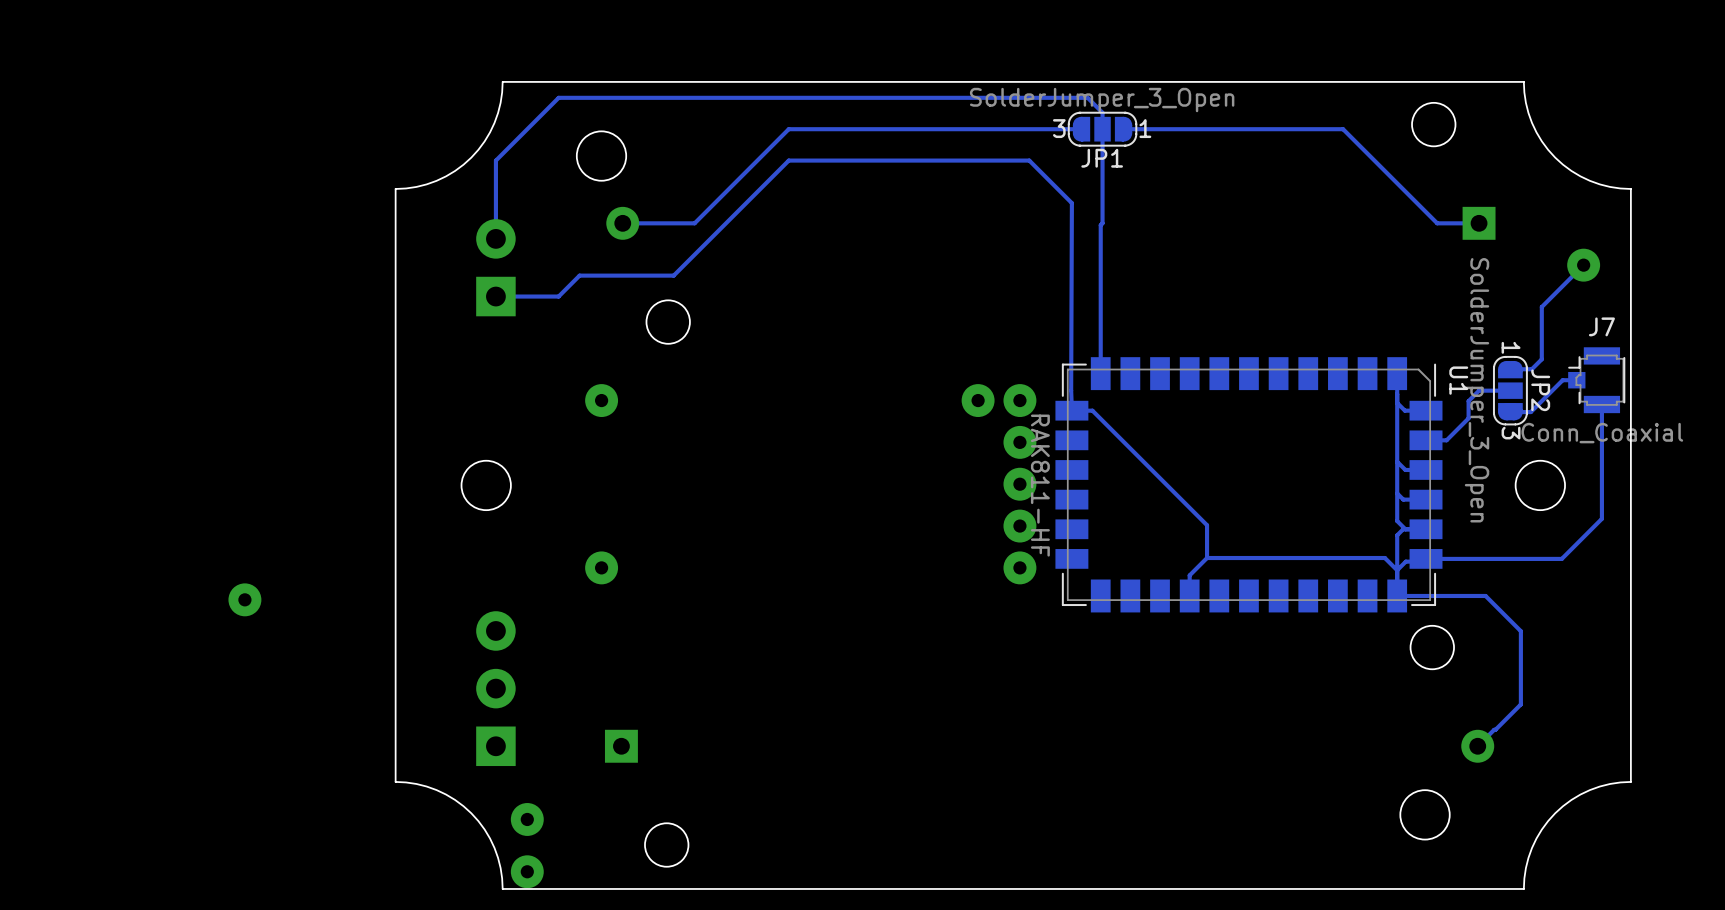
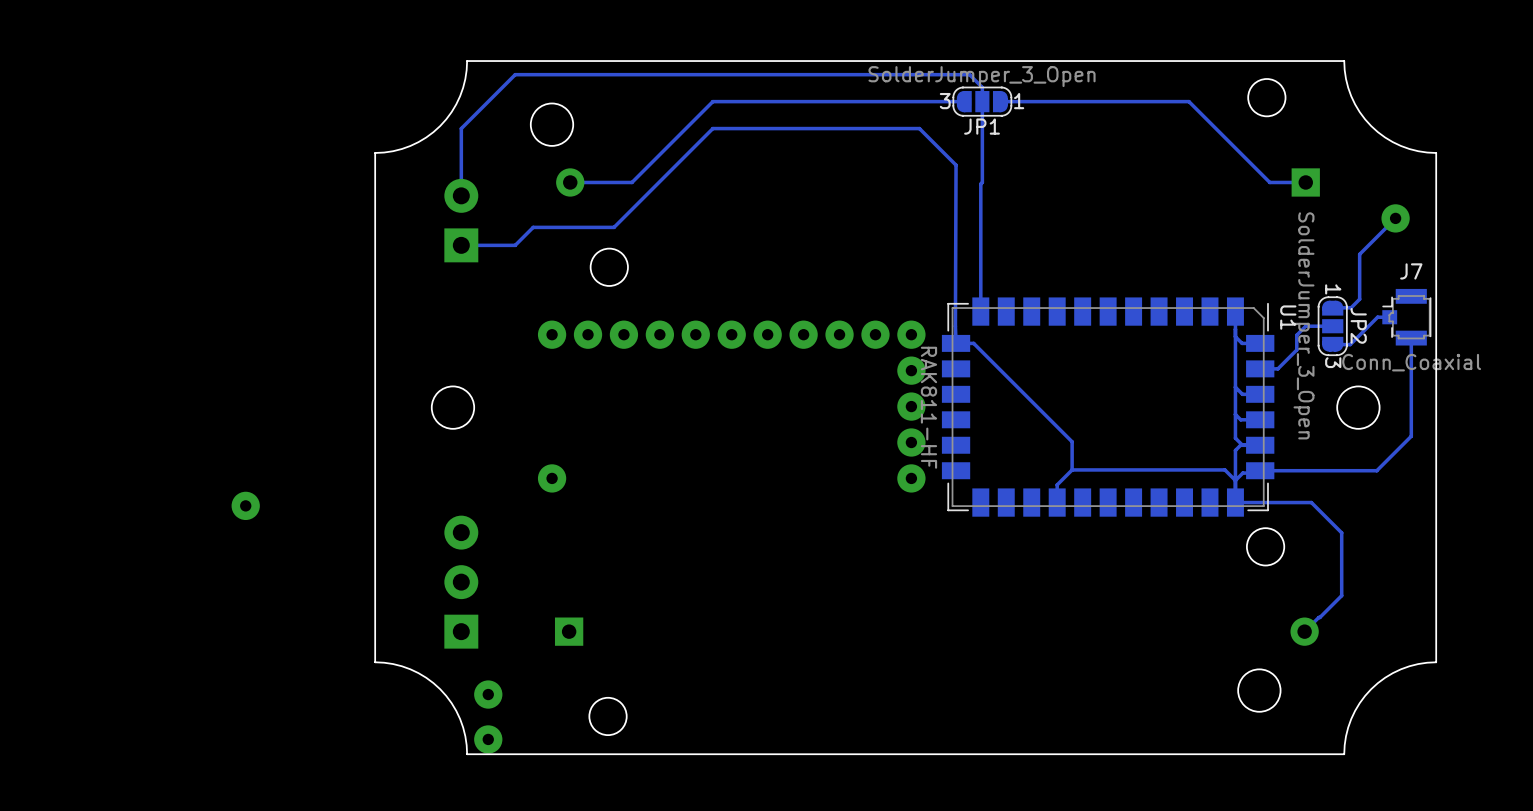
part: none -> (588, 334)
part: none -> (623, 334)
part: none -> (659, 334)
part: none -> (695, 334)
part: none -> (731, 334)
part: none -> (767, 334)
part: none -> (803, 334)
part: none -> (839, 334)

